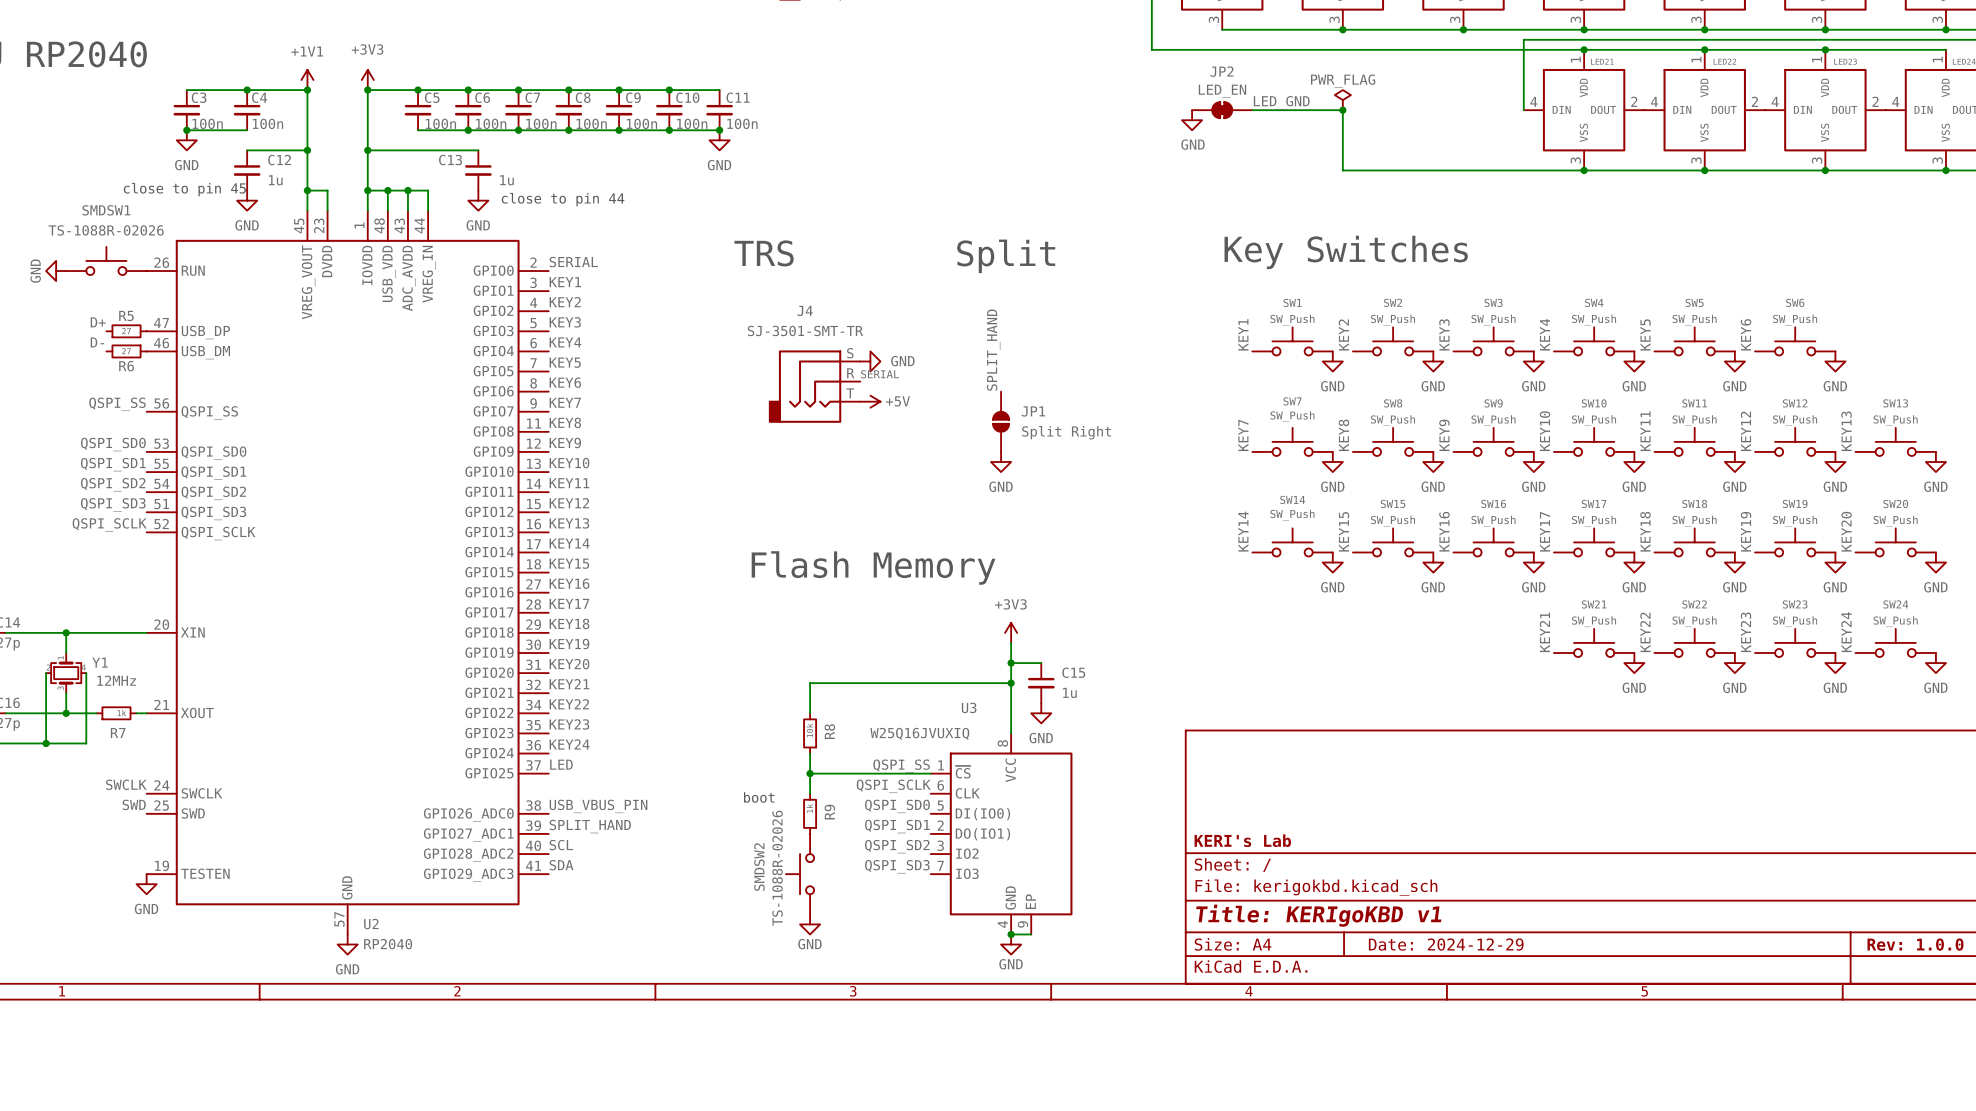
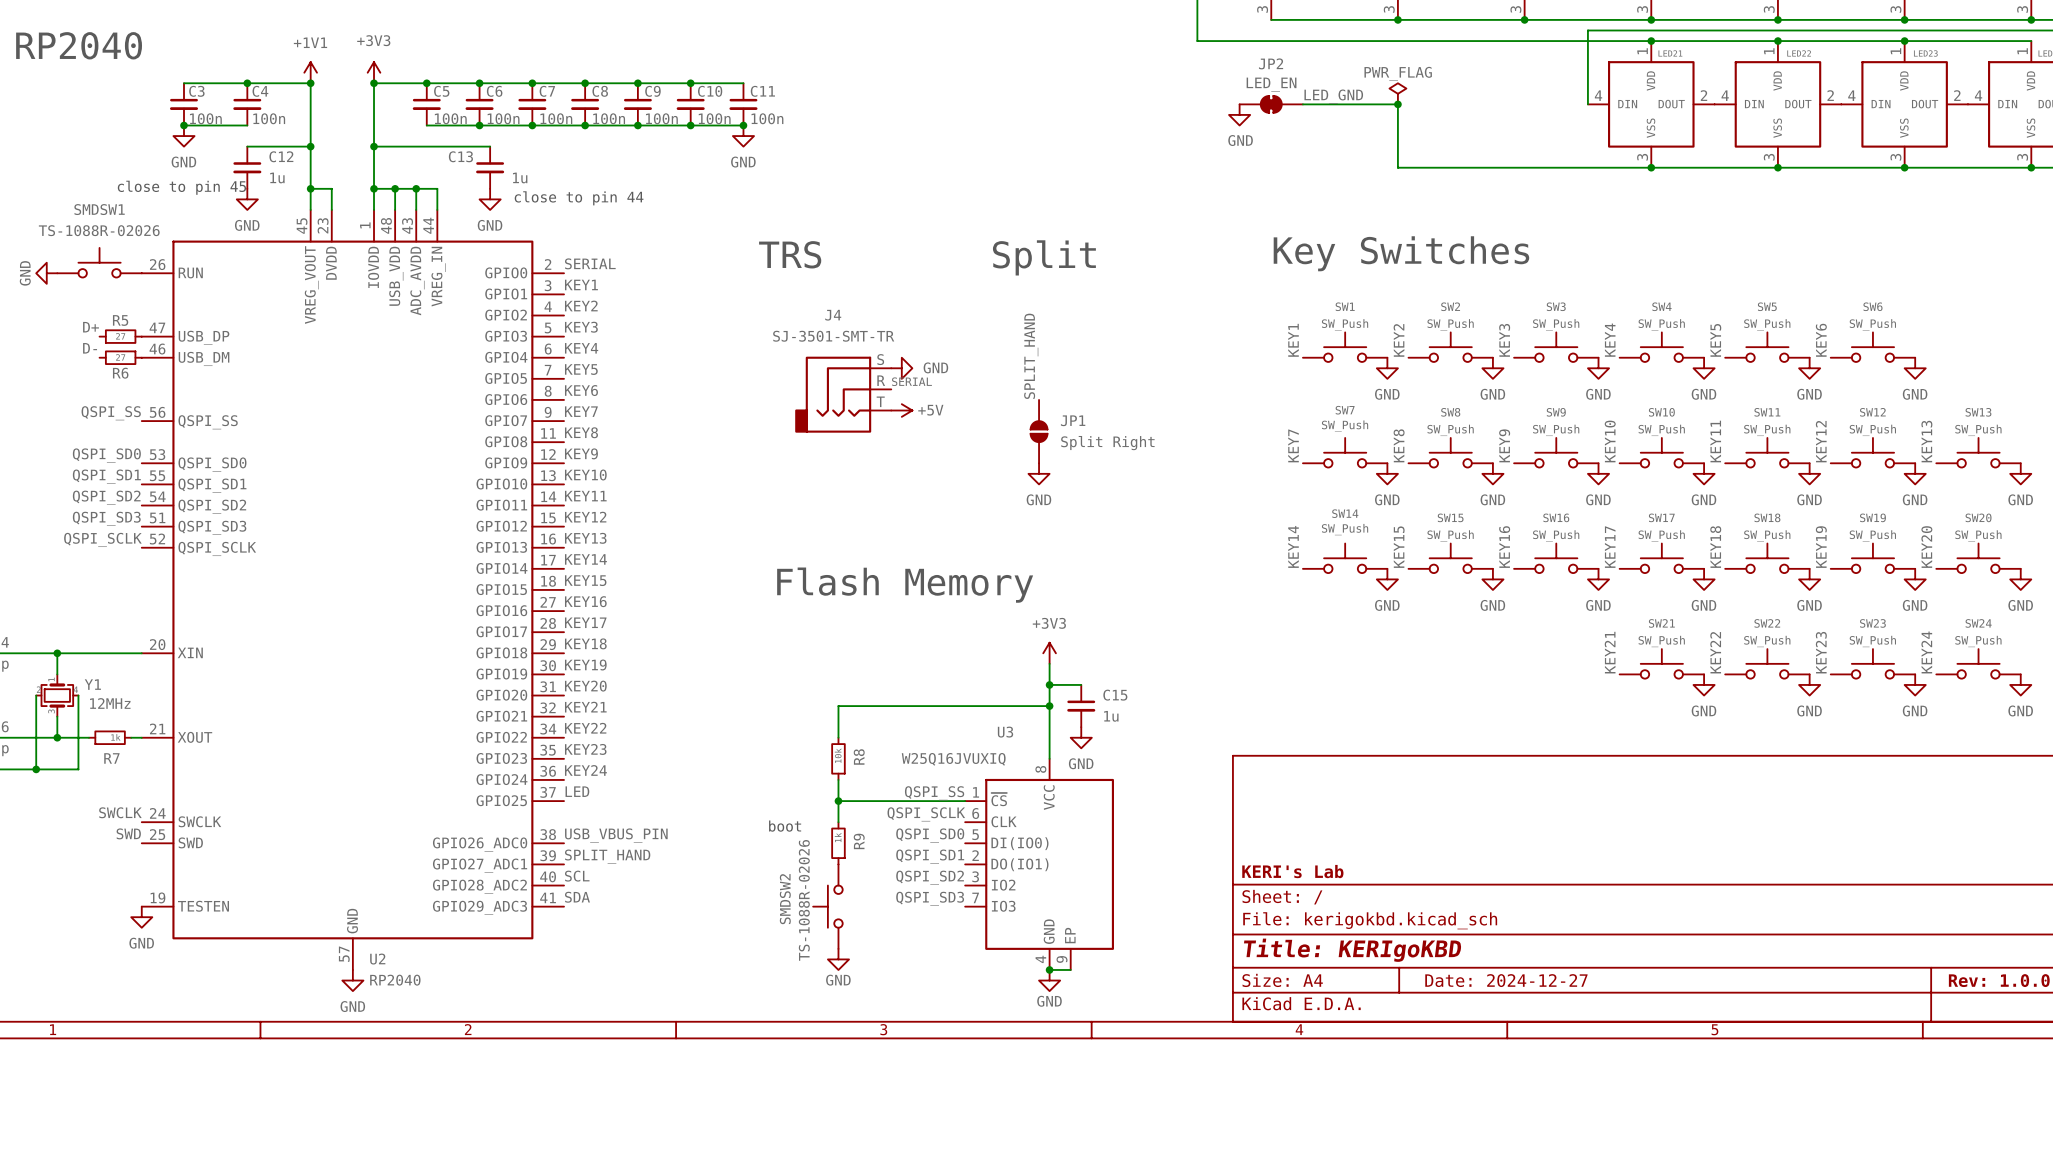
title block: Title: KERIgoKBD v1 (1318, 915) -> Title: KERIgoKBD (1352, 950)
title block: Date: 2024-12-29 (1446, 944) -> Date: 2024-12-27 (1506, 980)

